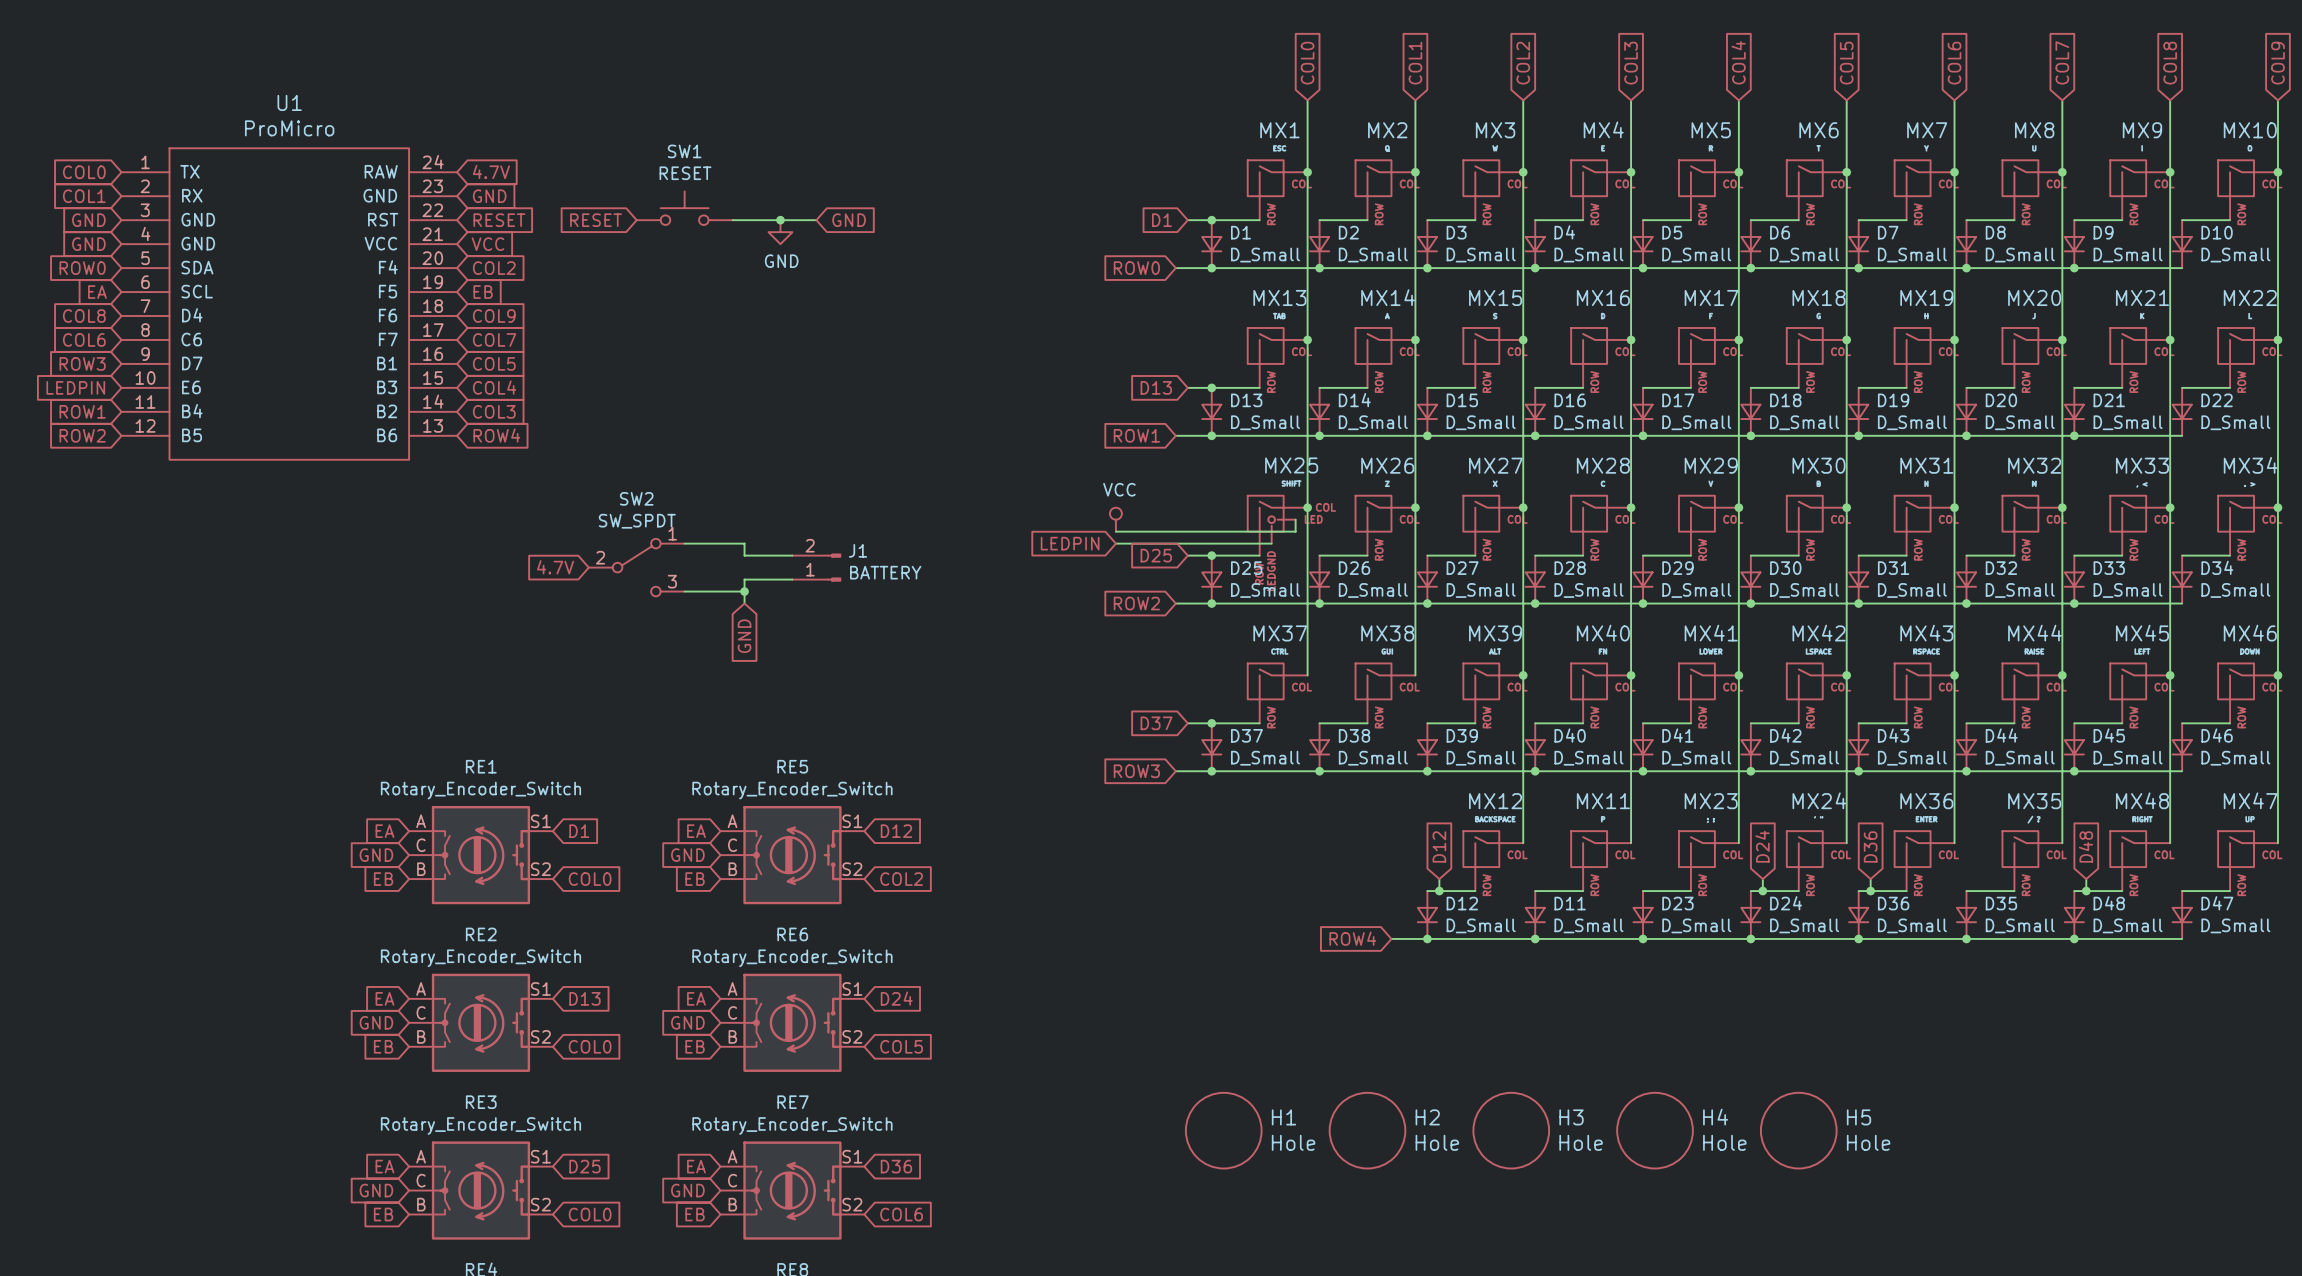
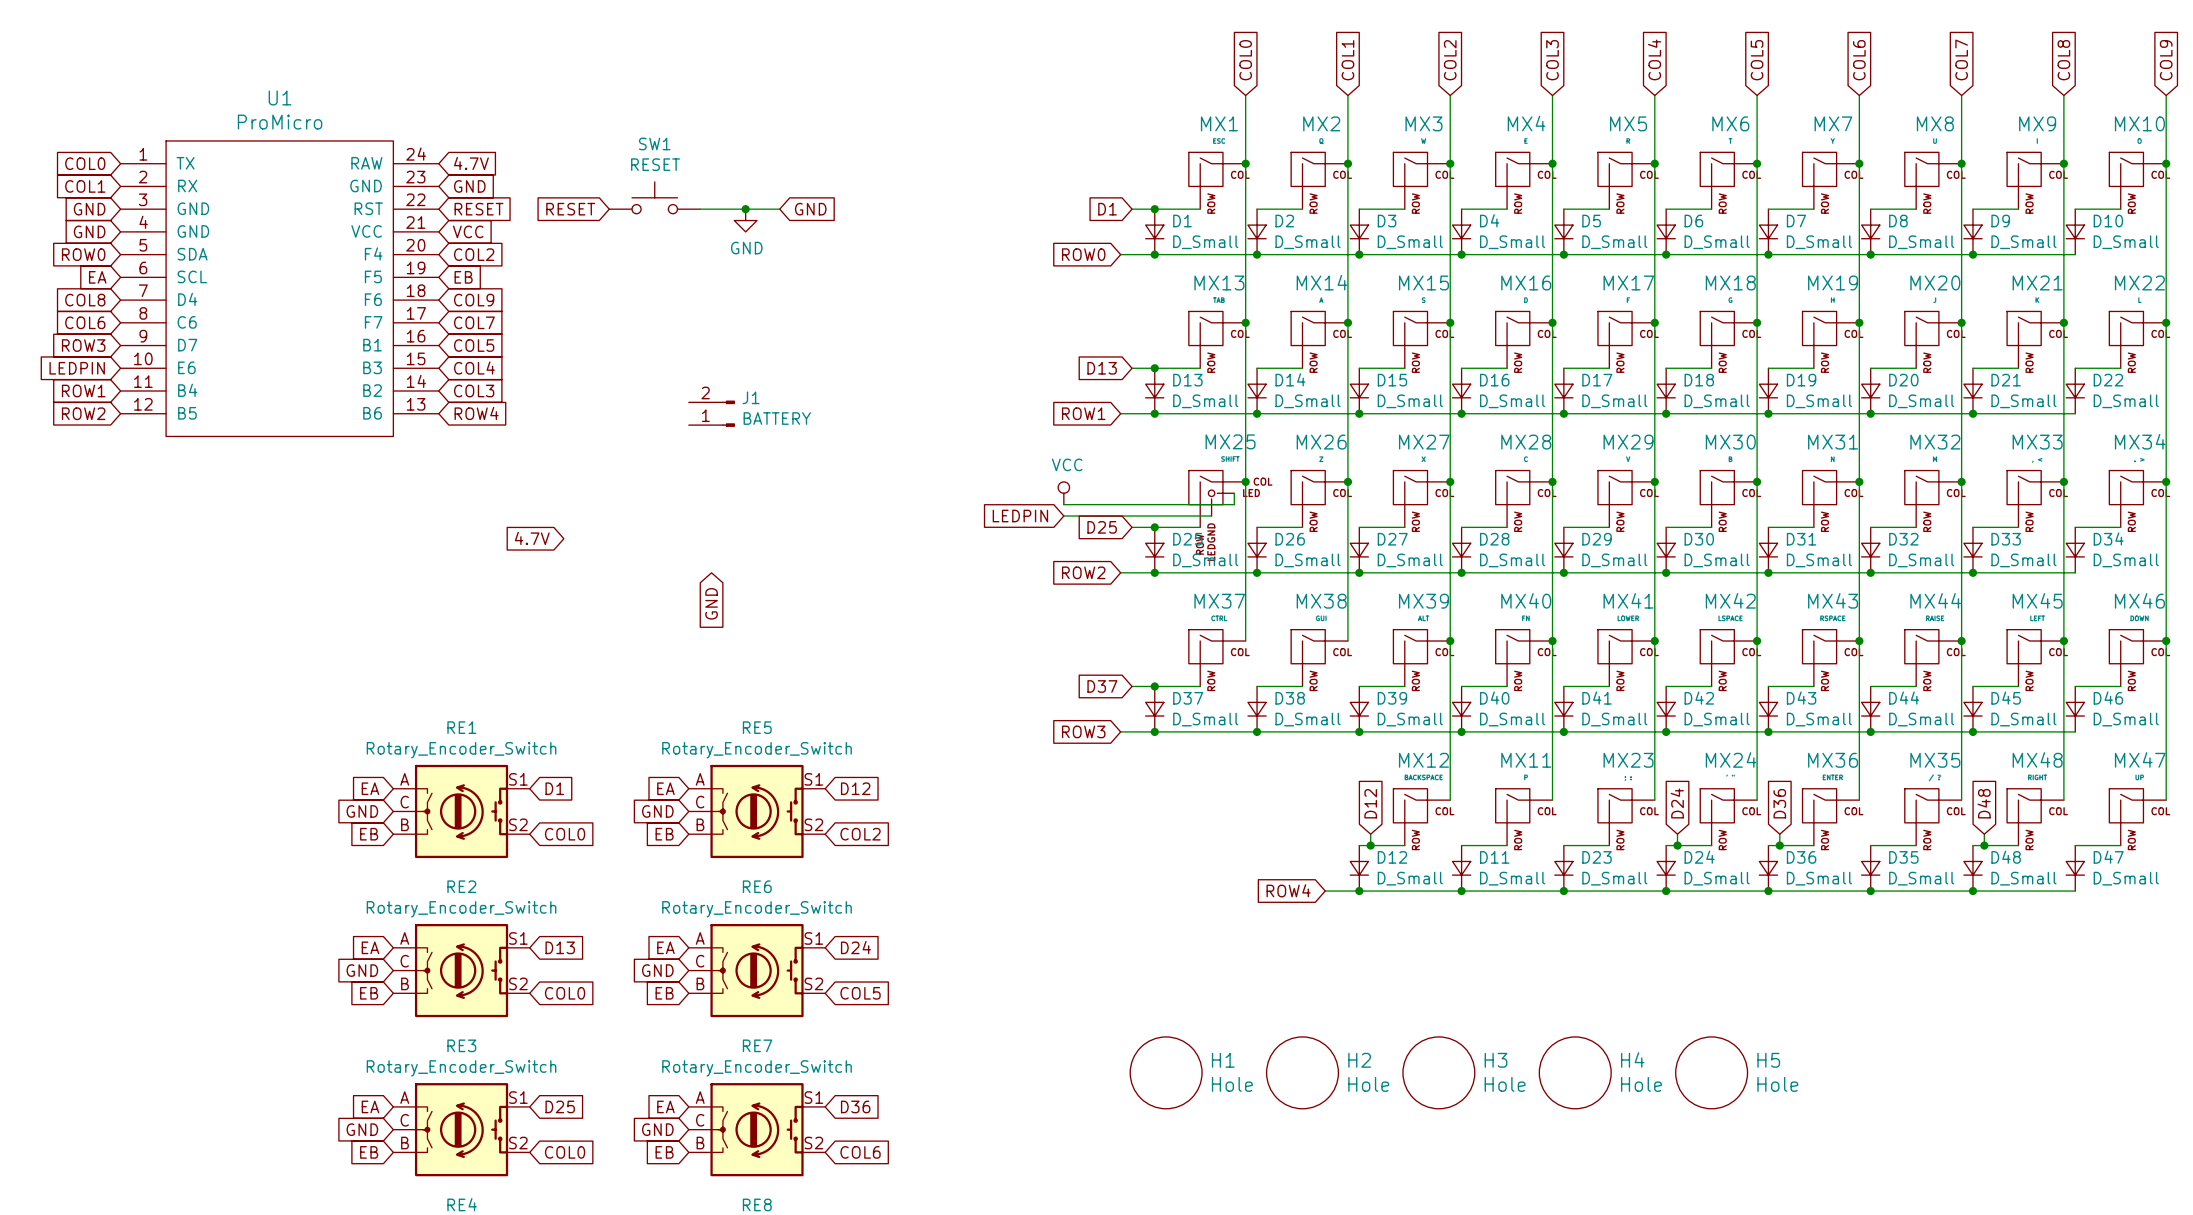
wire: (684, 543) (744, 543) (744, 555) (792, 555) -> none
SW2: SW_SPDT (636, 567) -> none
J1 position: (816, 567) -> (711, 413)
wire: (792, 579) (744, 579) (744, 603) -> none
wire: (684, 591) (744, 591) -> none
junction: (744, 591) -> none

